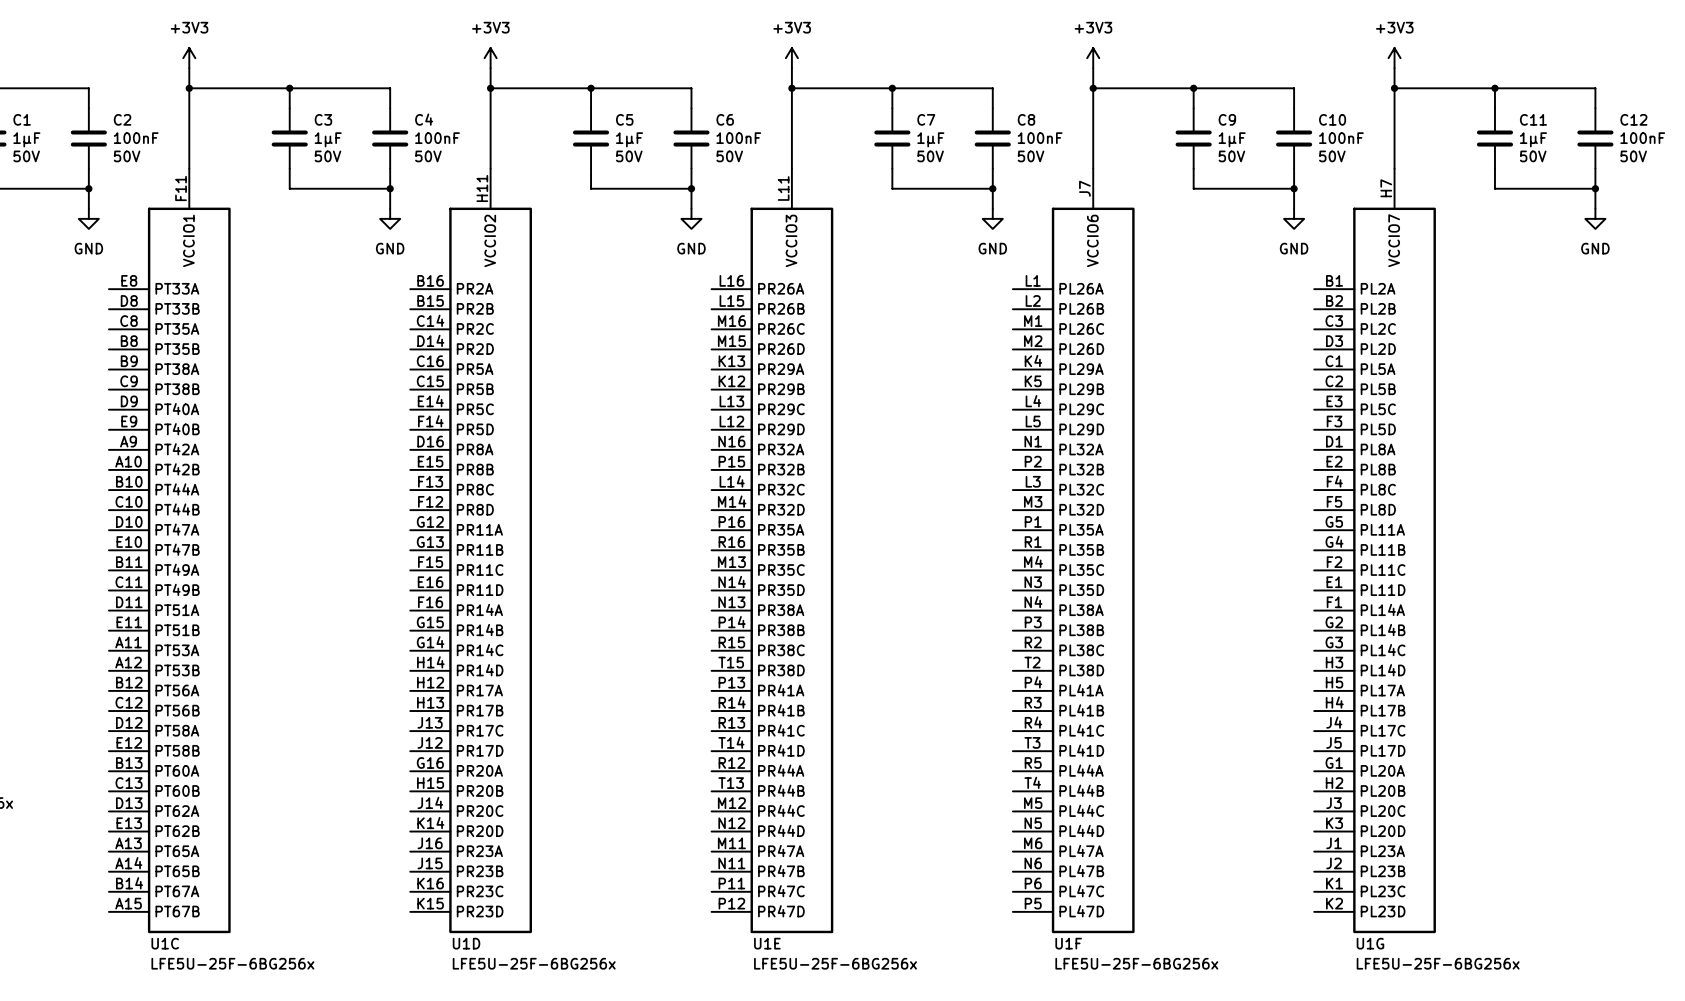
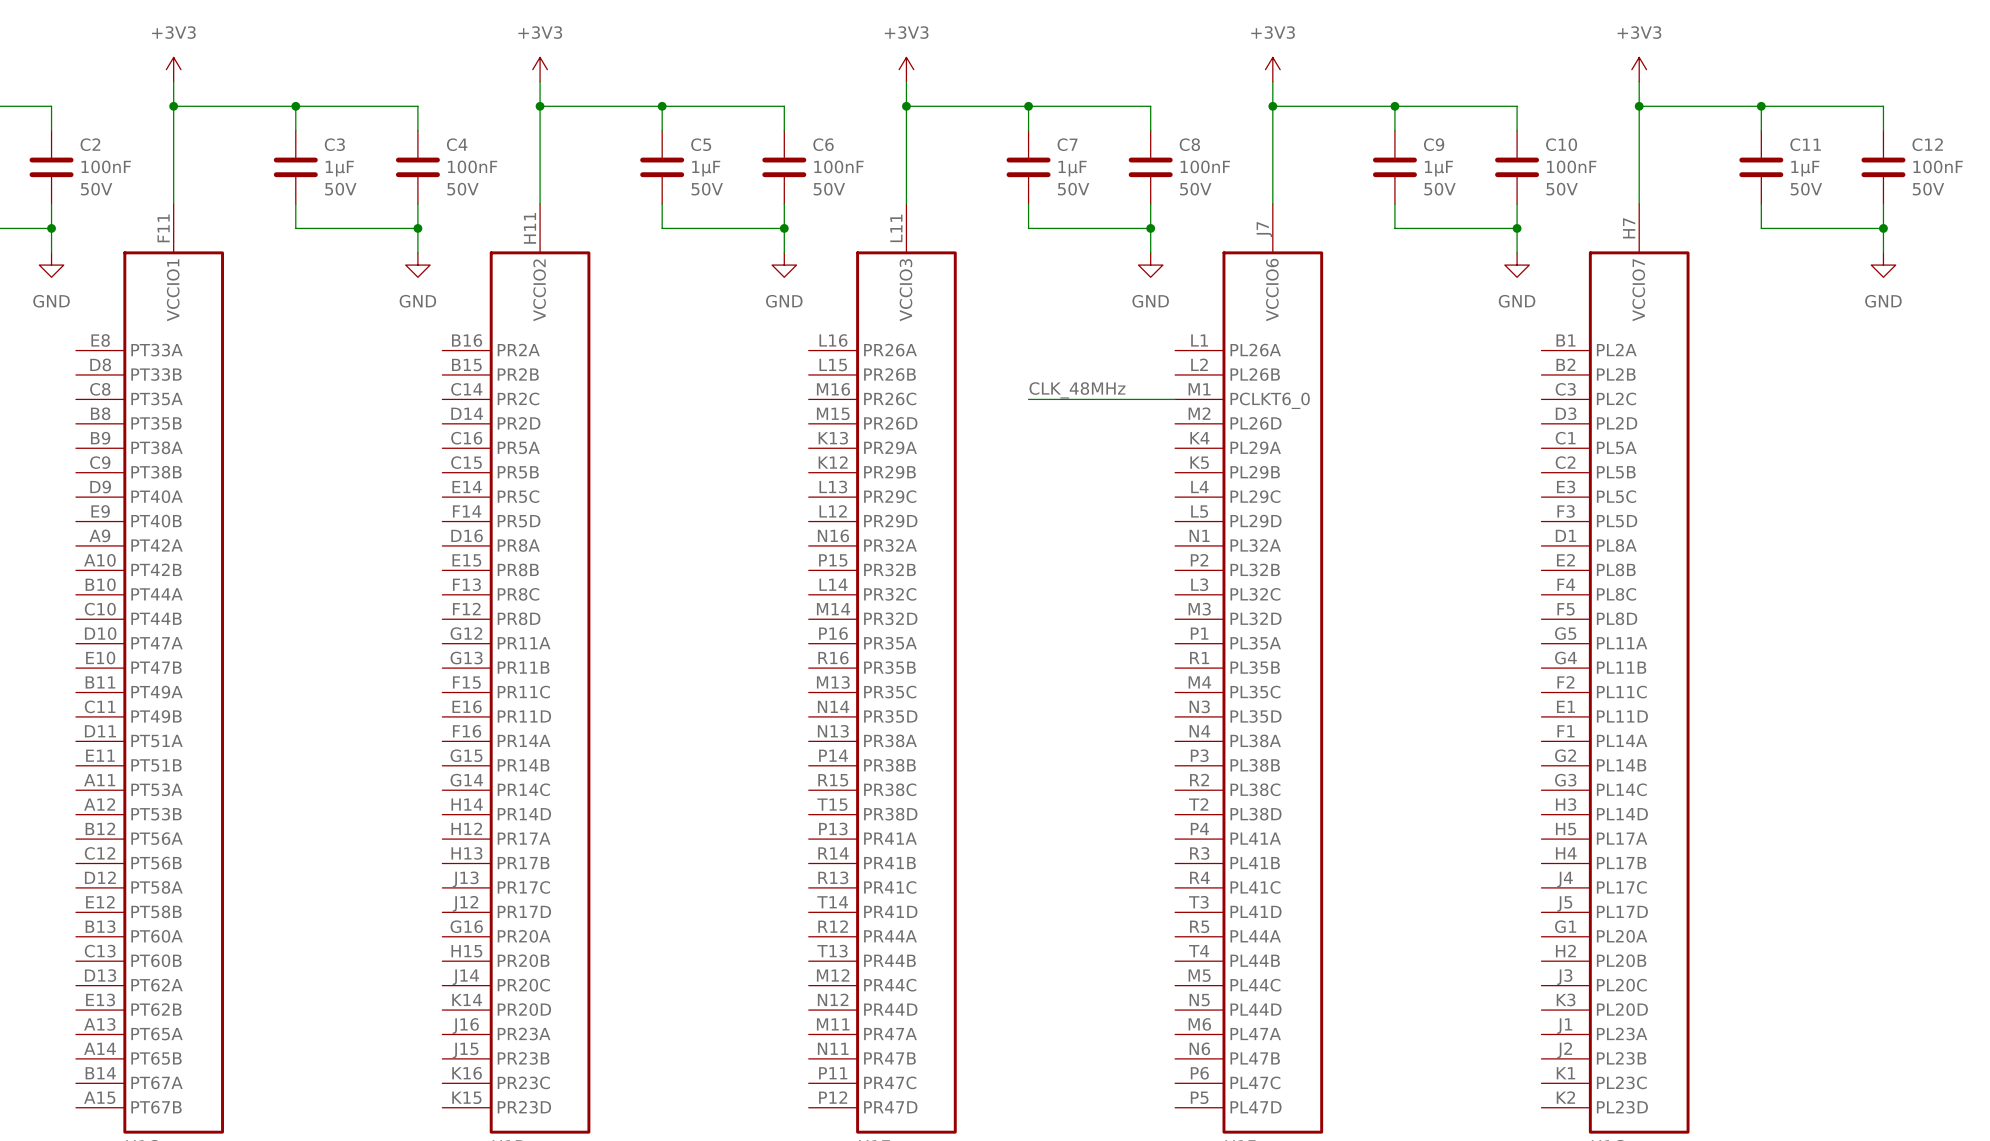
label: none -> CLK_48MHz (1077, 390)
U1F pin name: PL26C (1081, 328) -> PCLKT6_0 (1270, 400)
wire: none -> (1028, 399) (1175, 399)

